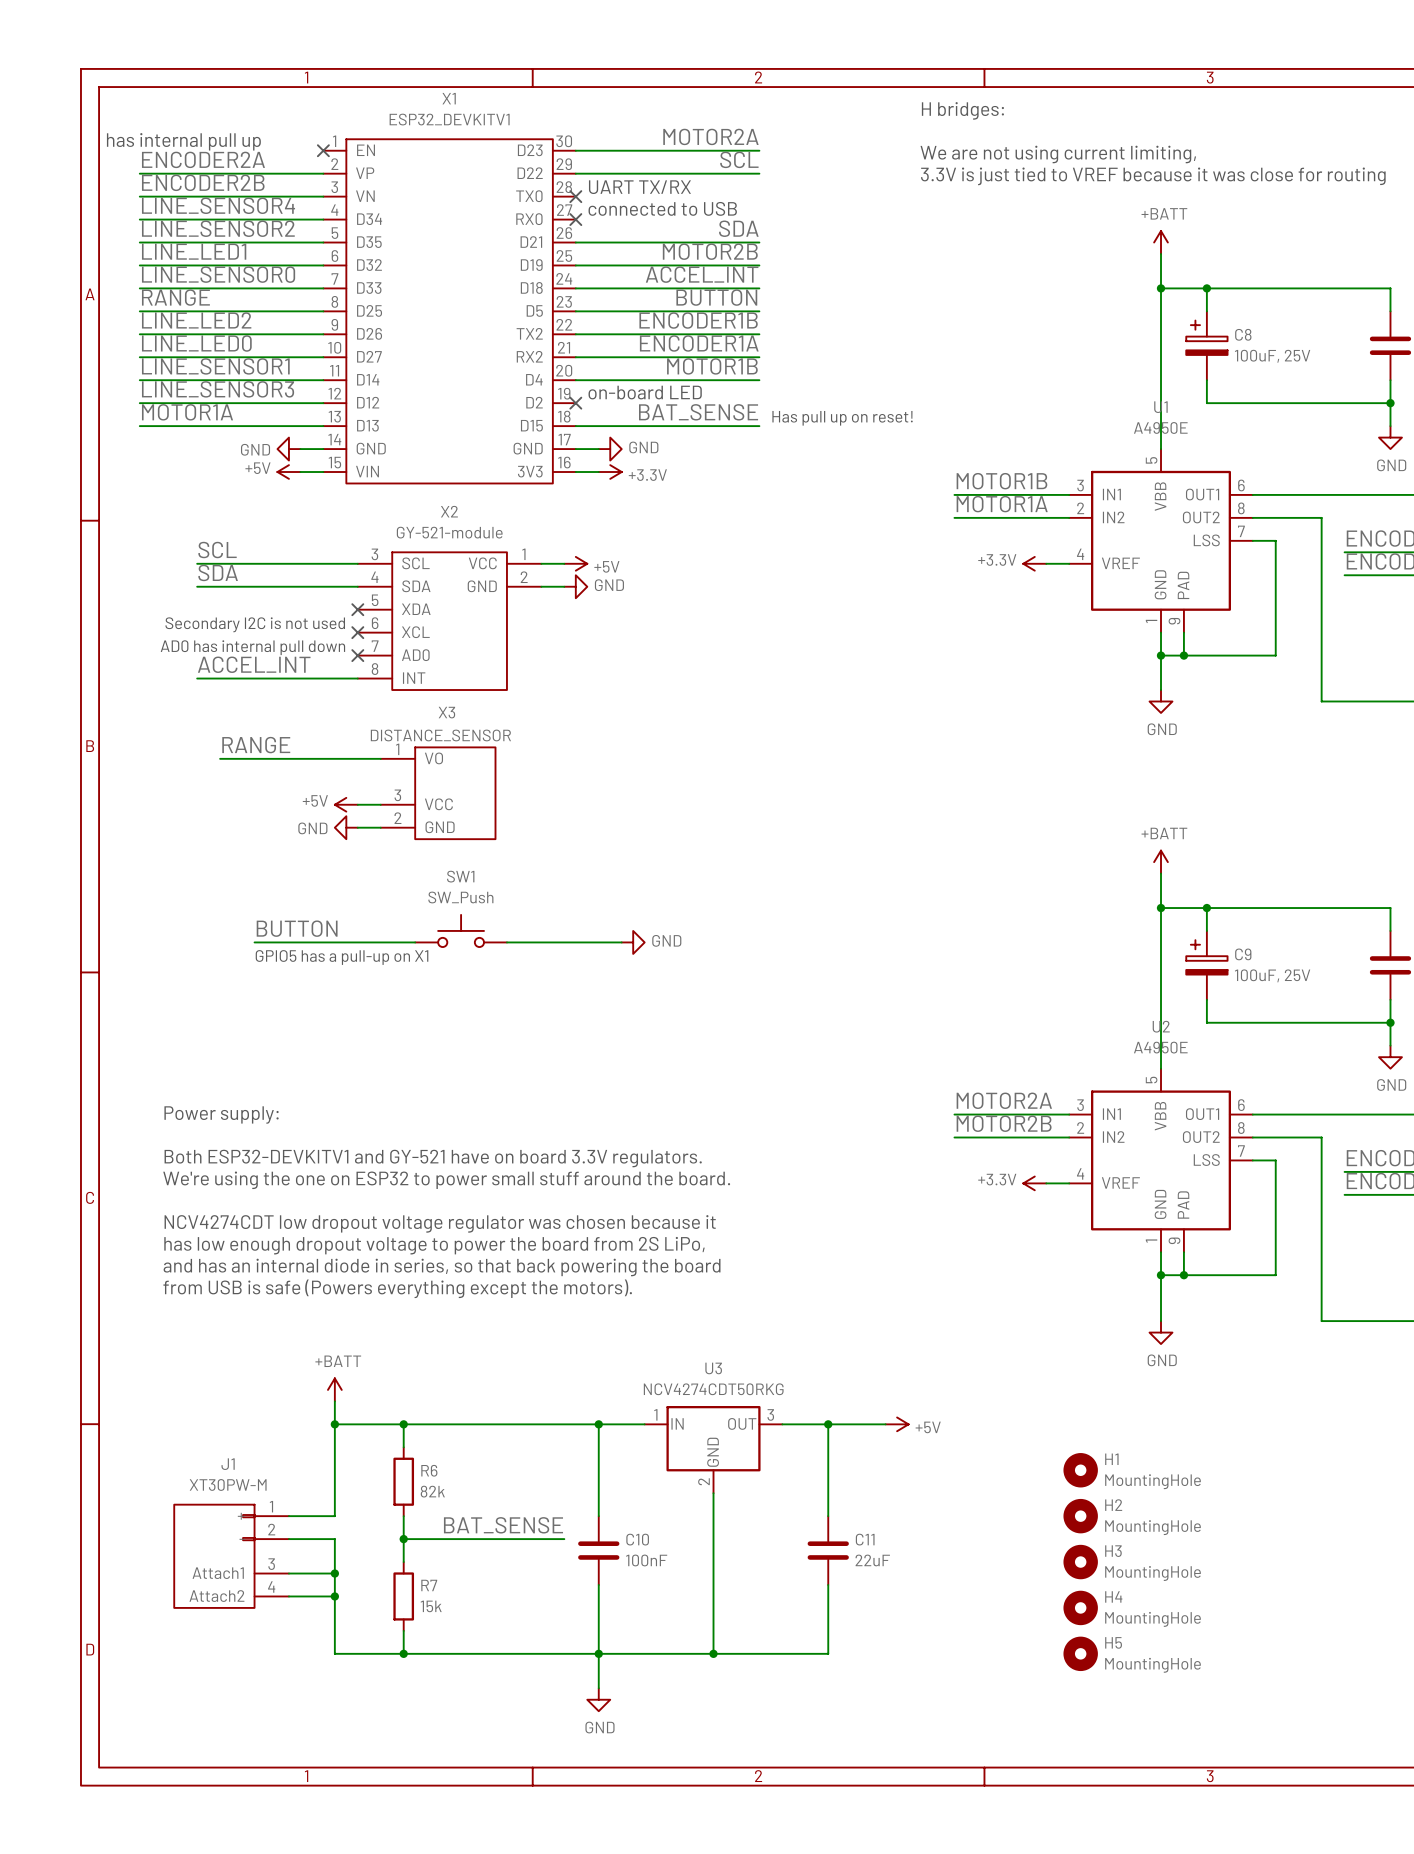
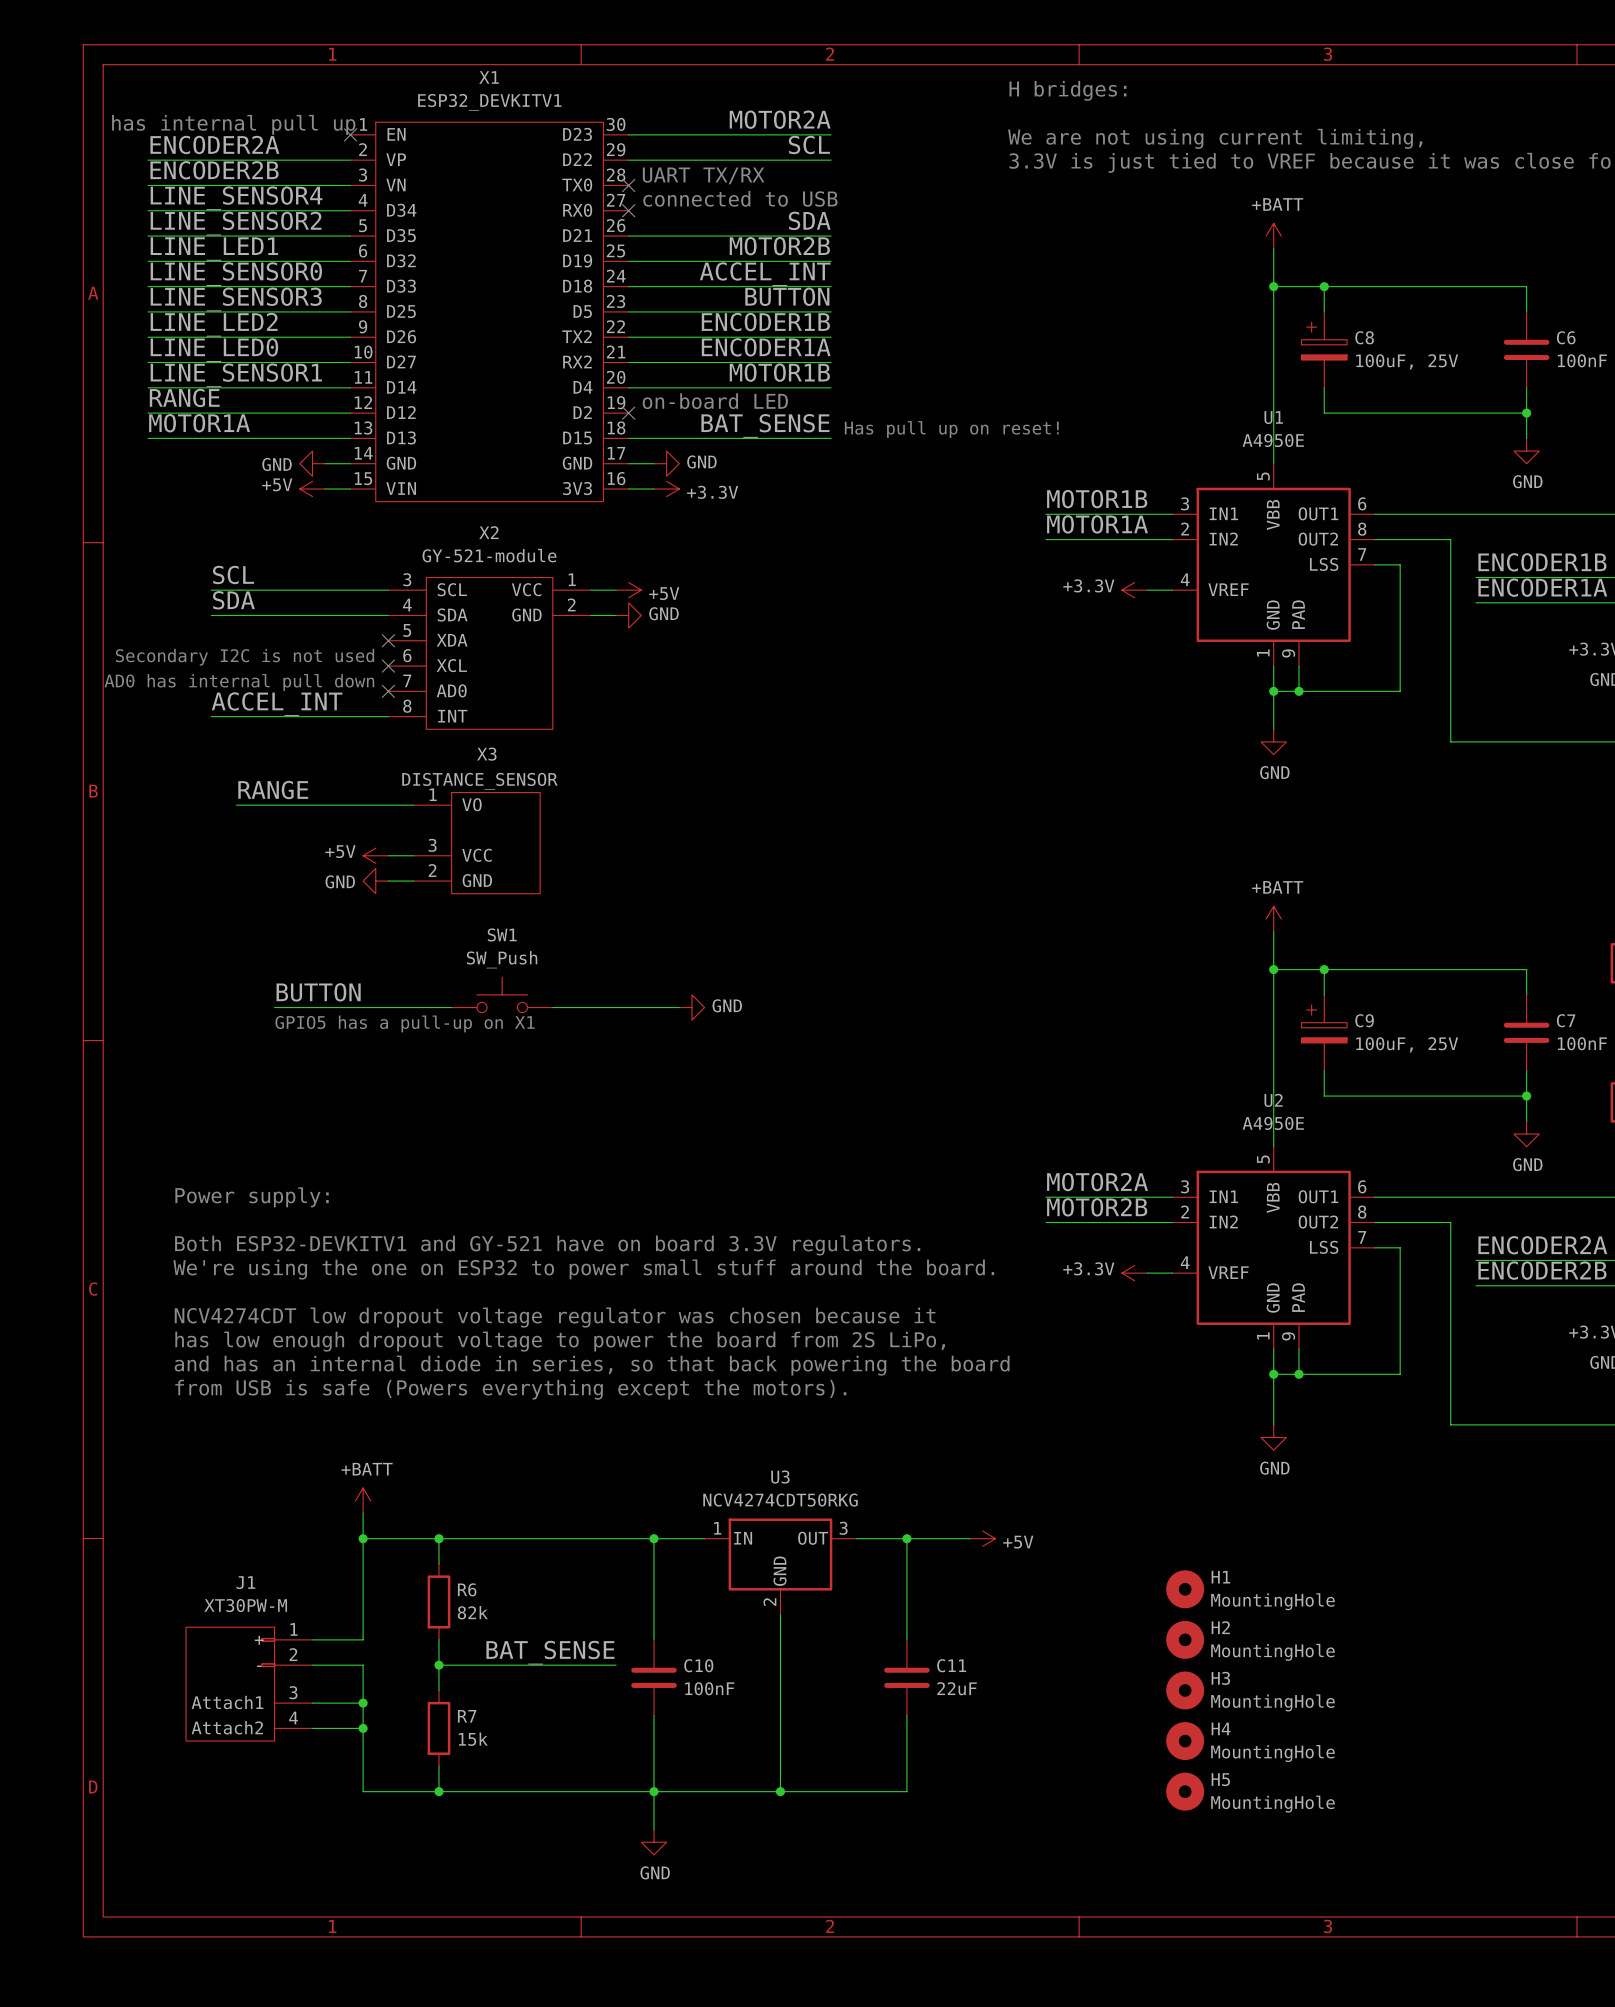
label: RANGE (175, 297) -> LINE_SENSOR3 (236, 299)
label: LINE_SENSOR3 (218, 389) -> RANGE (184, 397)

